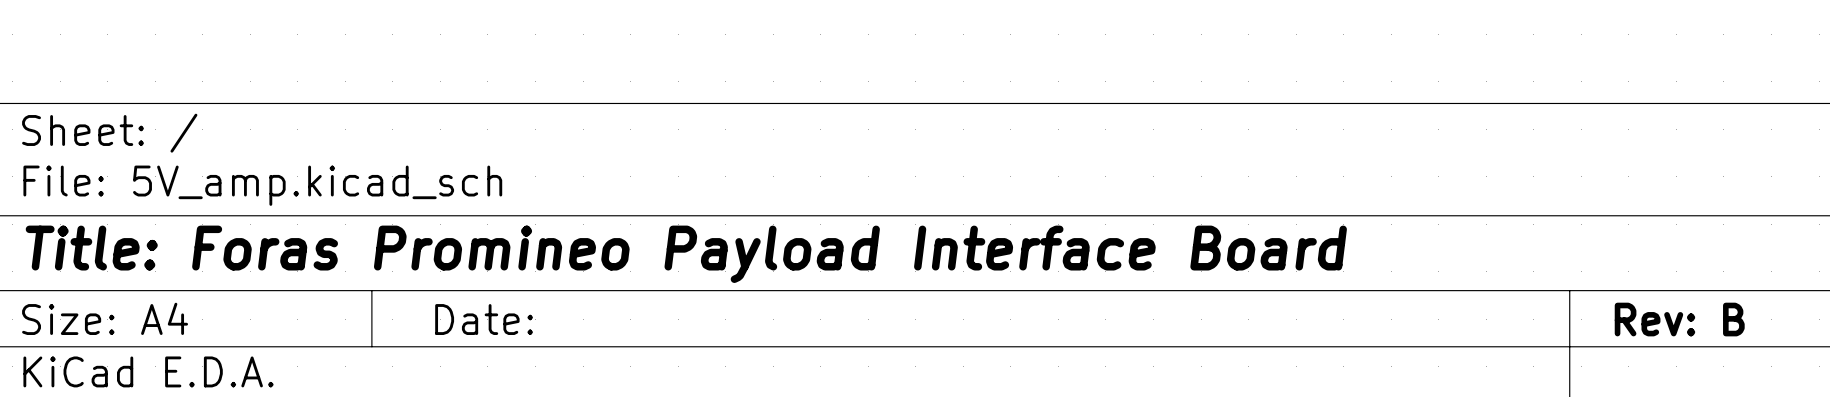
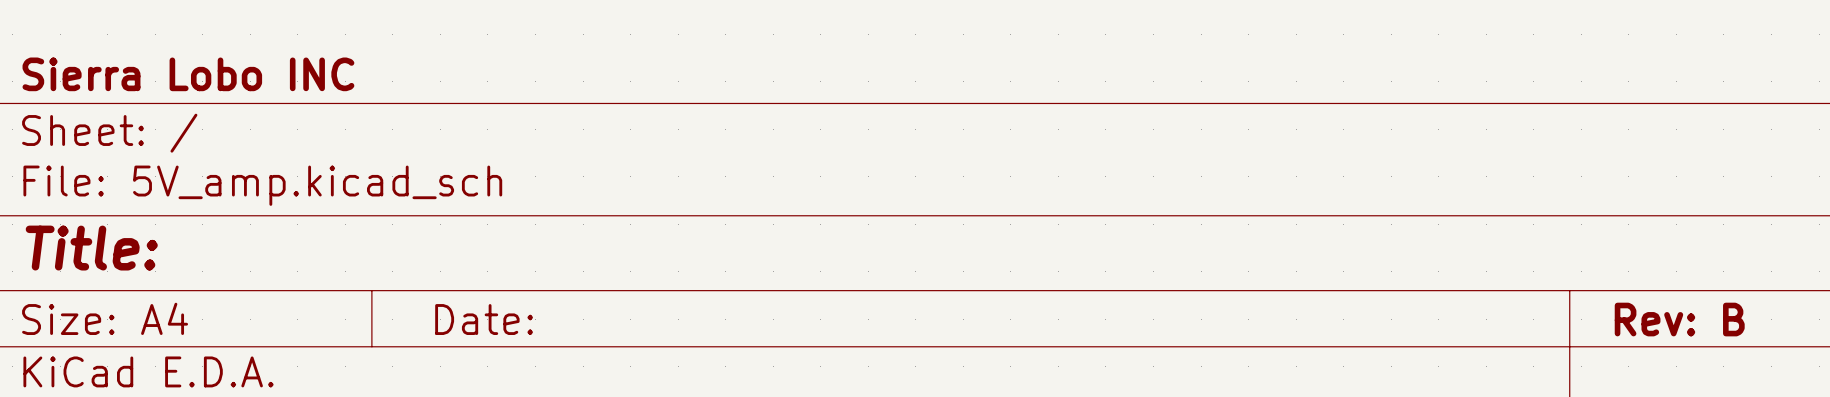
title block: none -> Sierra Lobo INC (188, 74)
title block: Title: Foras Promineo Payload Interface Board (686, 254) -> Title: (91, 248)

